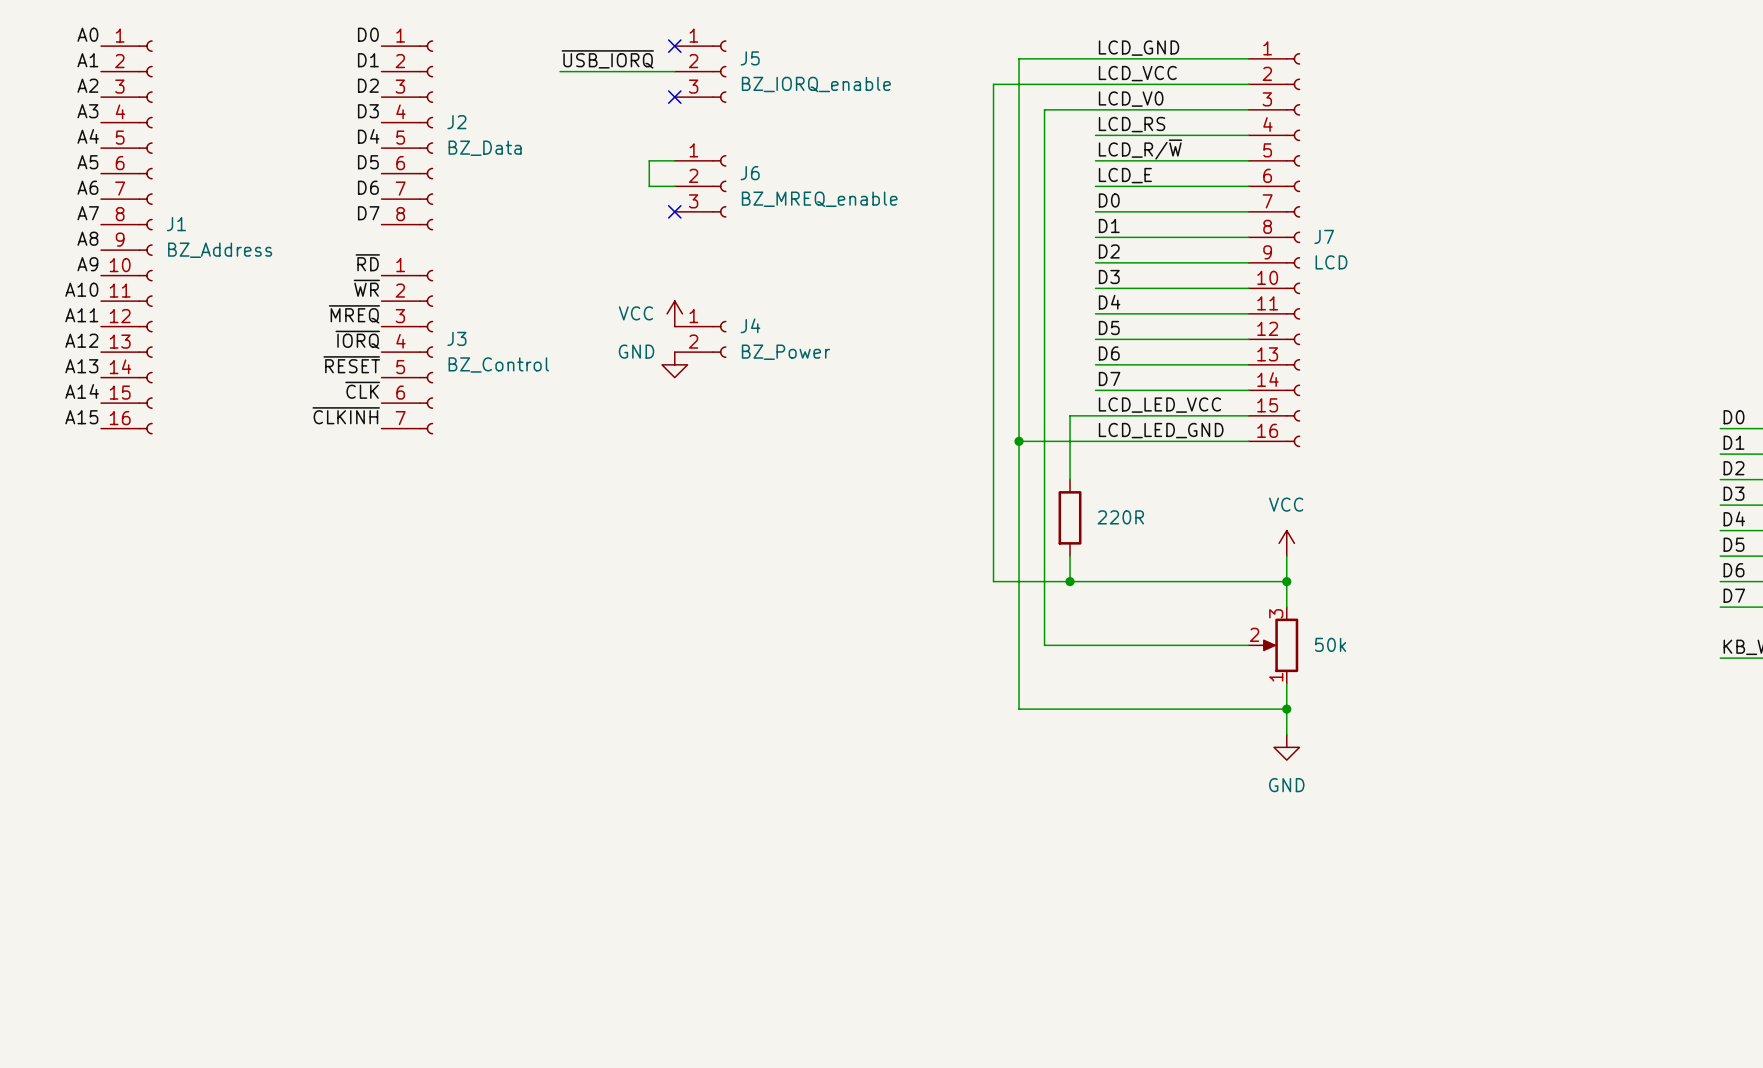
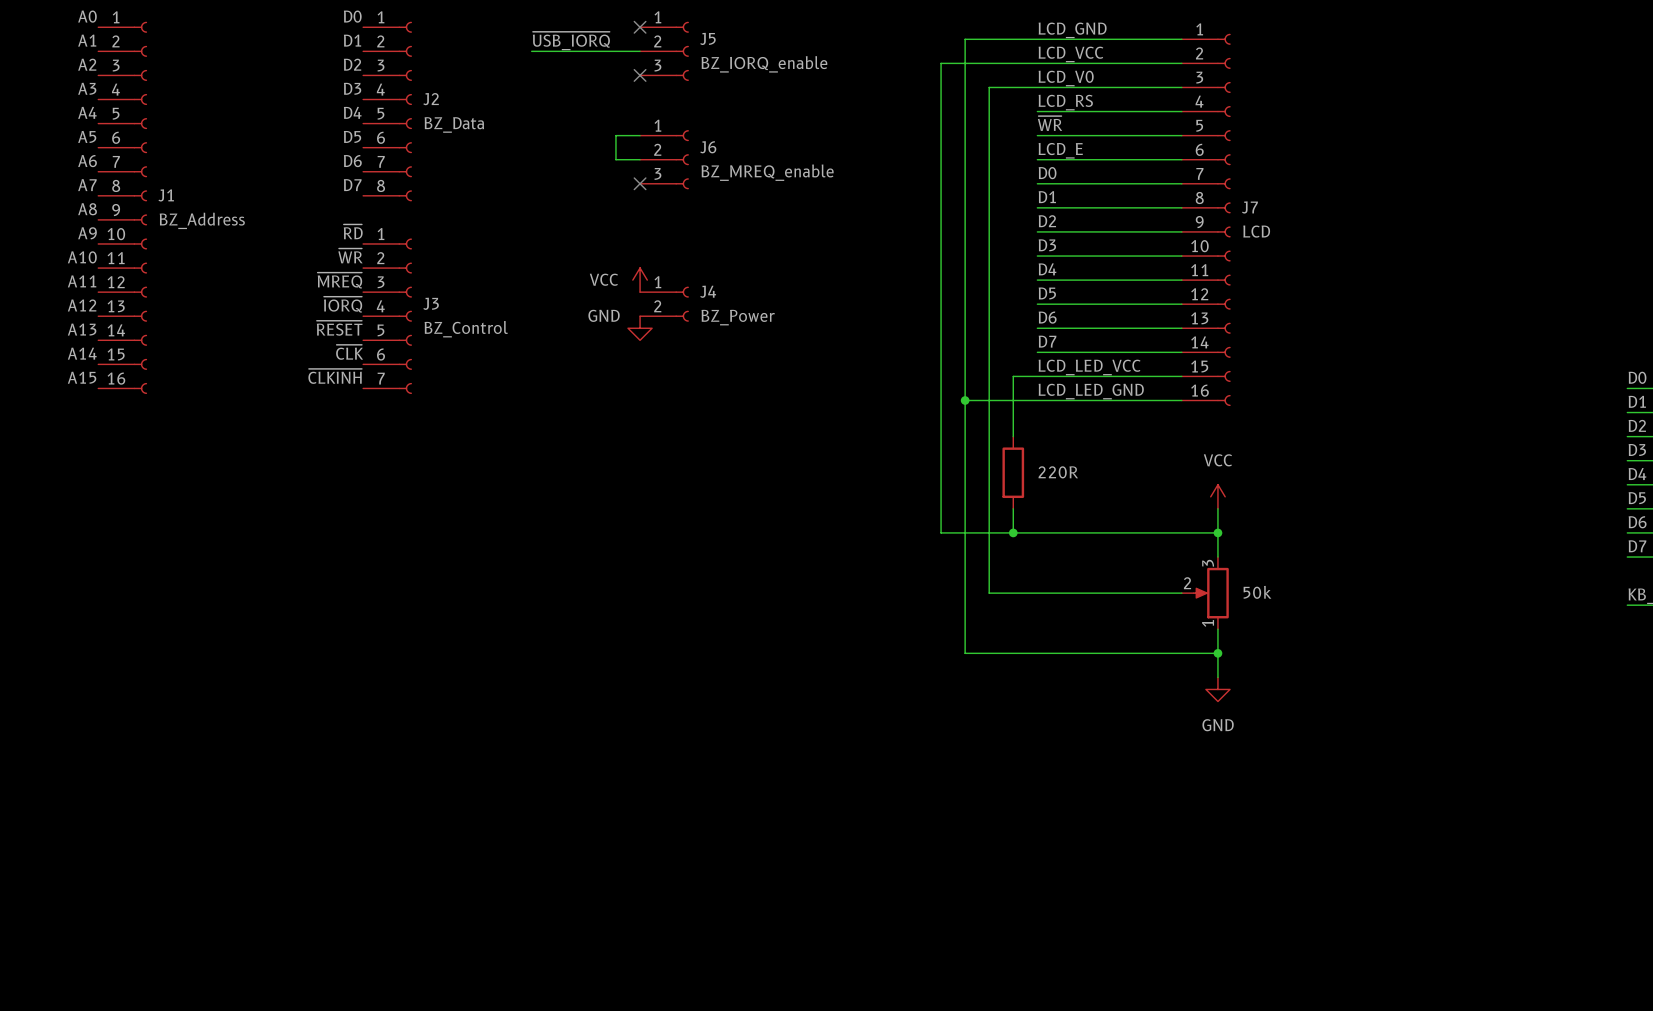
label: LCD_R/~{W} (1140, 149) -> ~{WR} (1050, 123)

